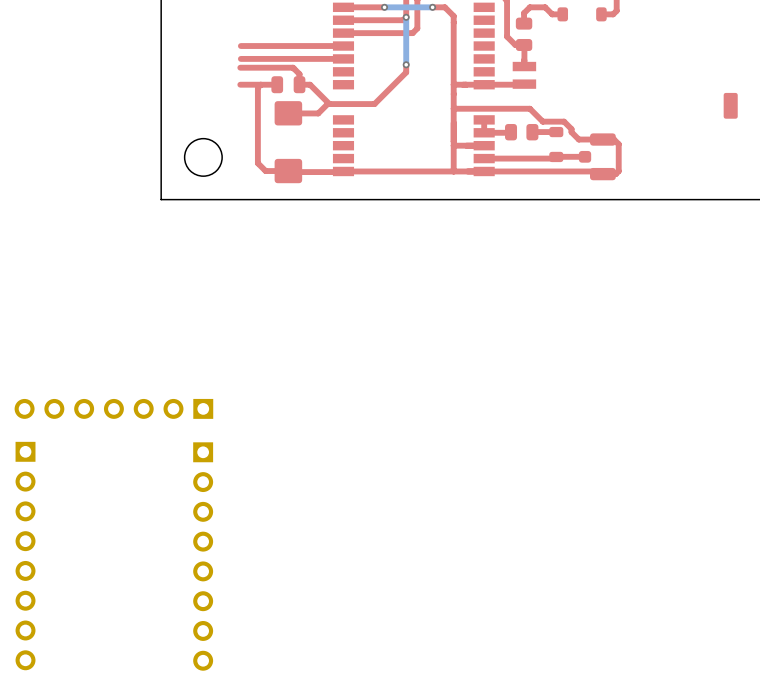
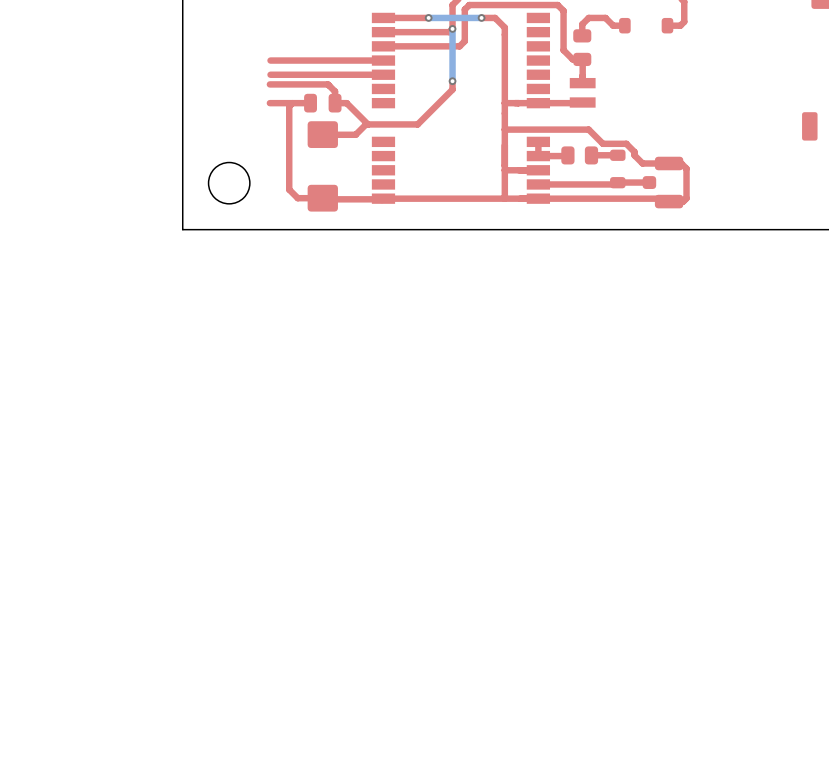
part: (113, 408) -> none
part: (25, 556) -> none
part: (203, 556) -> none

